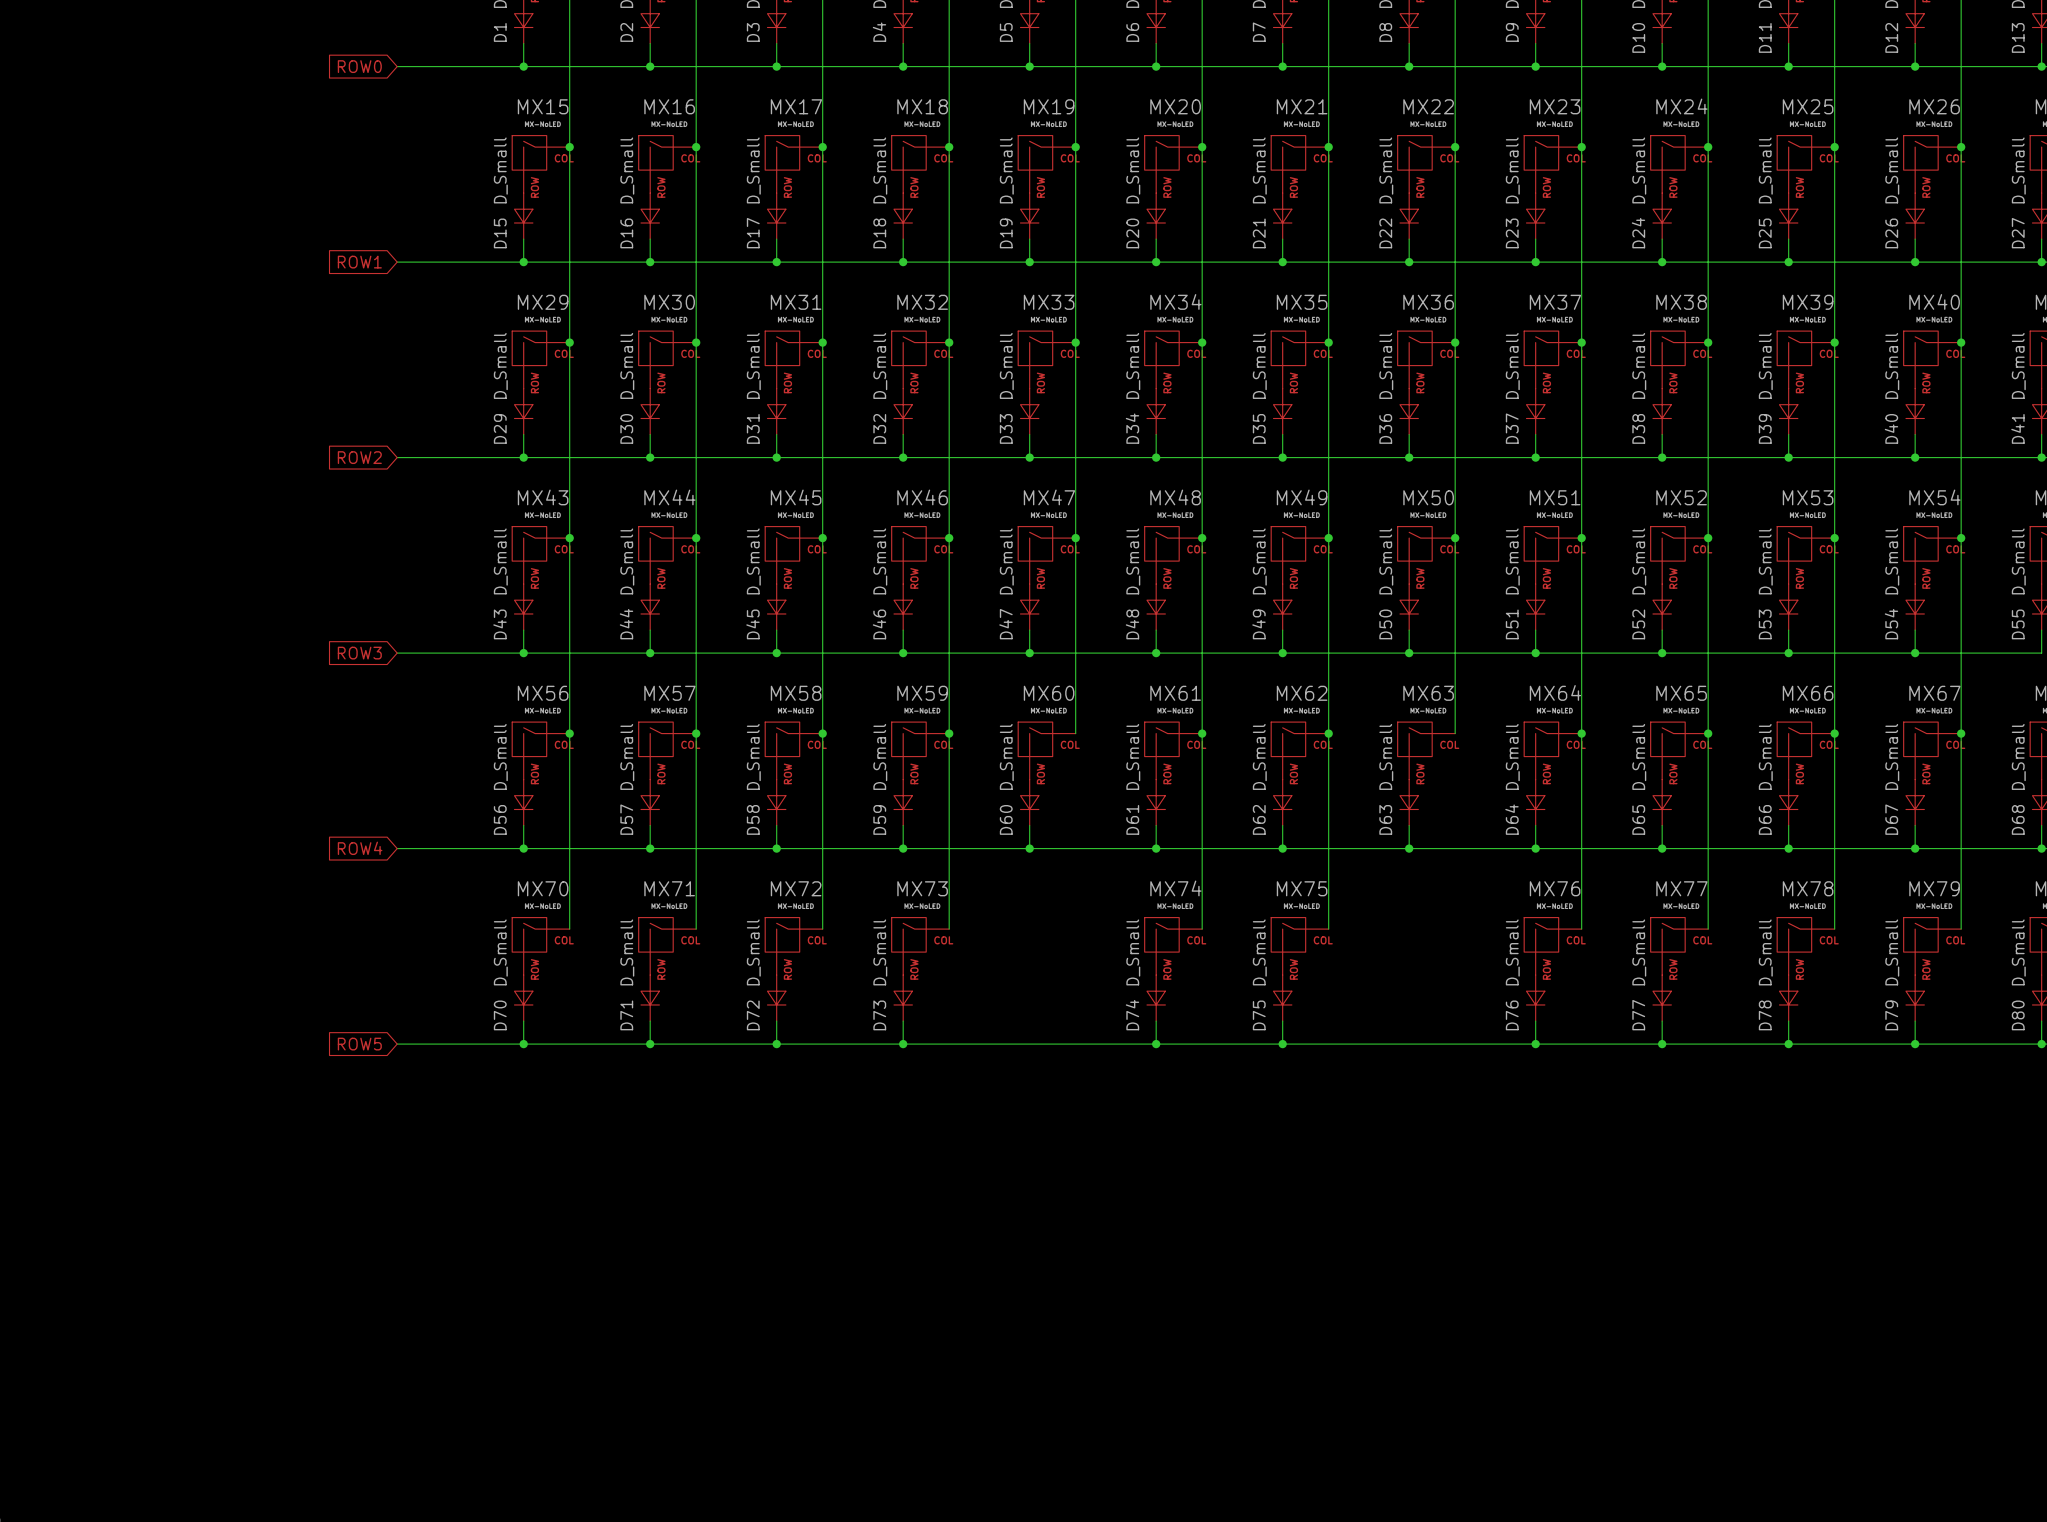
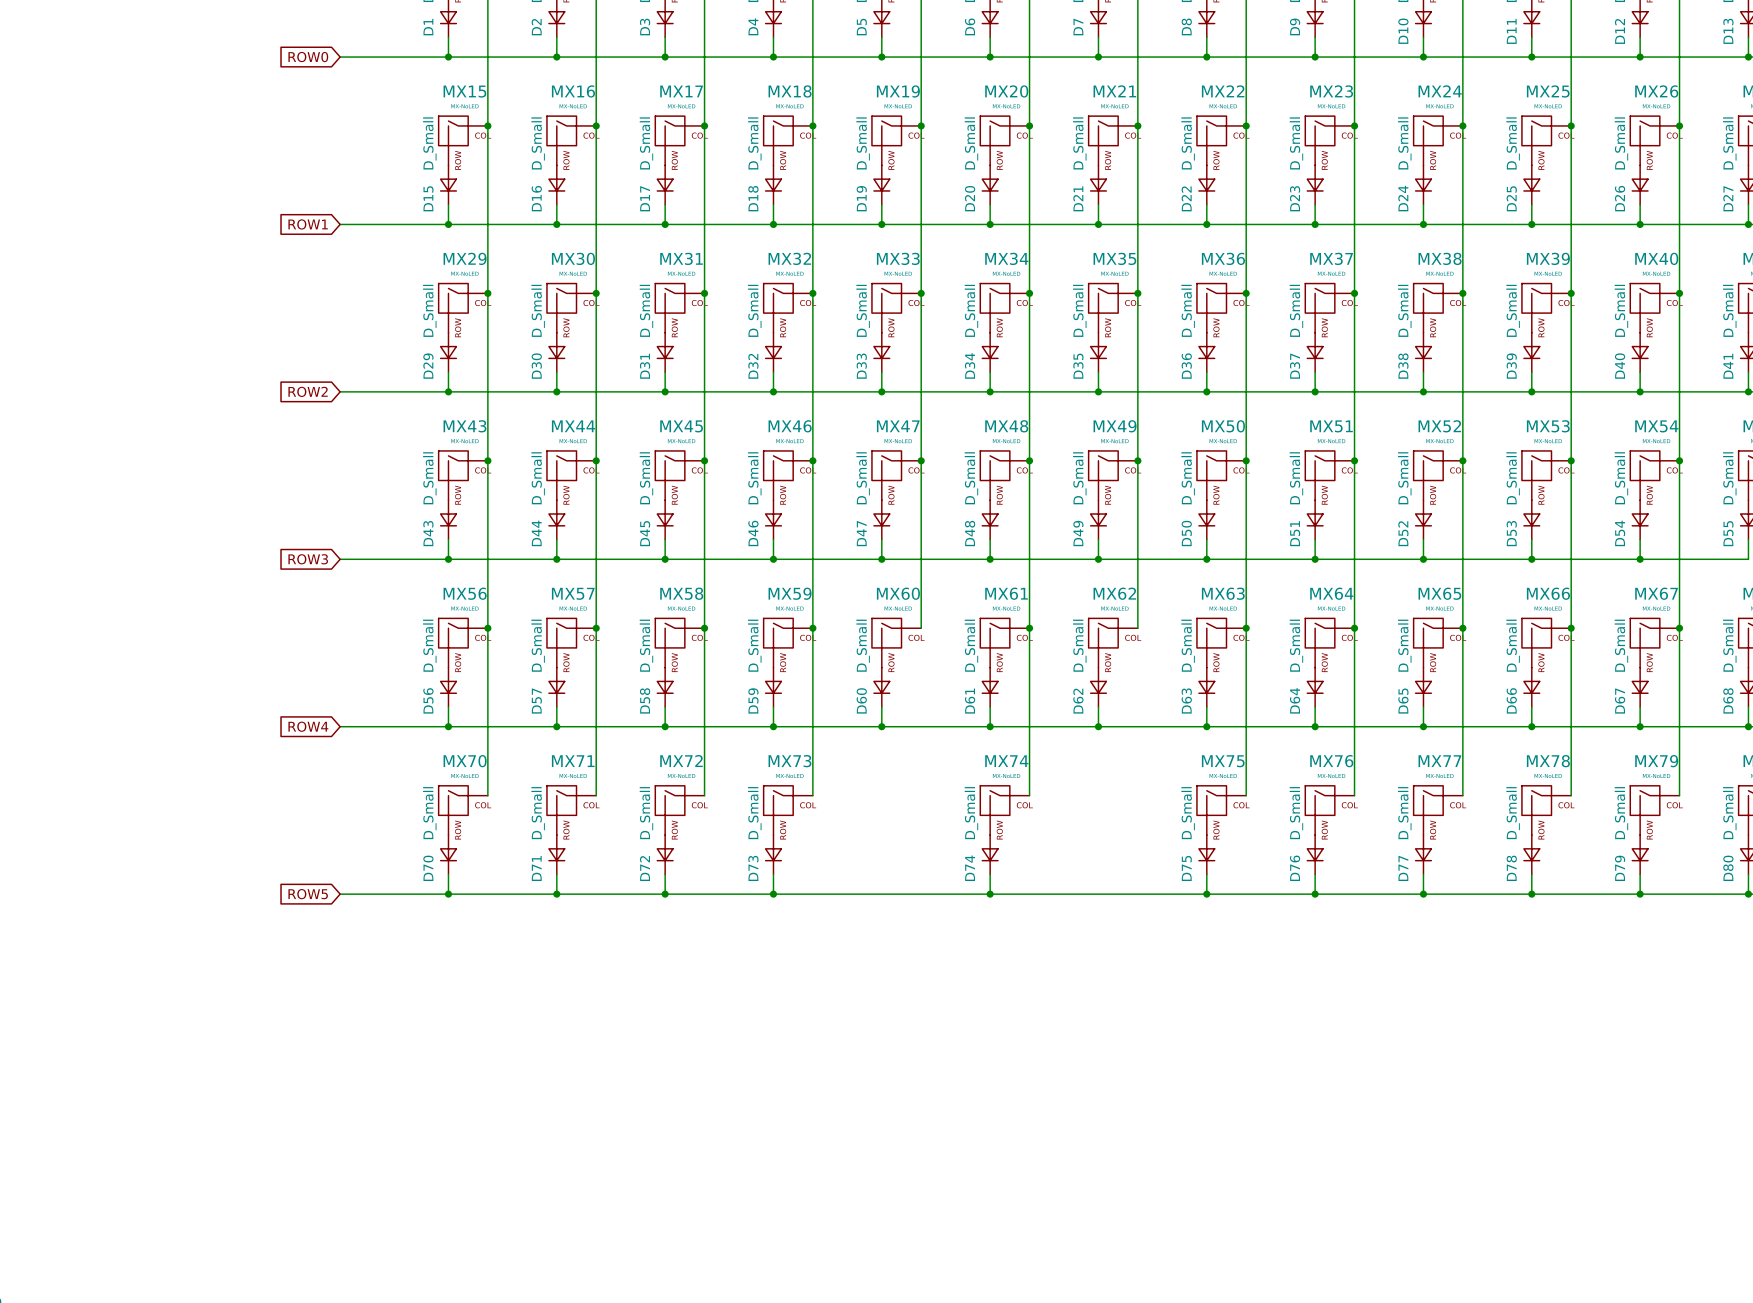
wire: (1328, 733) (1328, 929) -> (1246, 628) (1246, 795)
junction: (1328, 733) -> none
junction: none -> (1246, 628)
MX75 position: (1299, 946) -> (1221, 810)
D75 position: (1282, 998) -> (1206, 854)
wire: (1282, 1021) (1282, 1044) -> (1206, 874) (1206, 894)
junction: (1282, 1044) -> none
junction: none -> (1206, 894)

